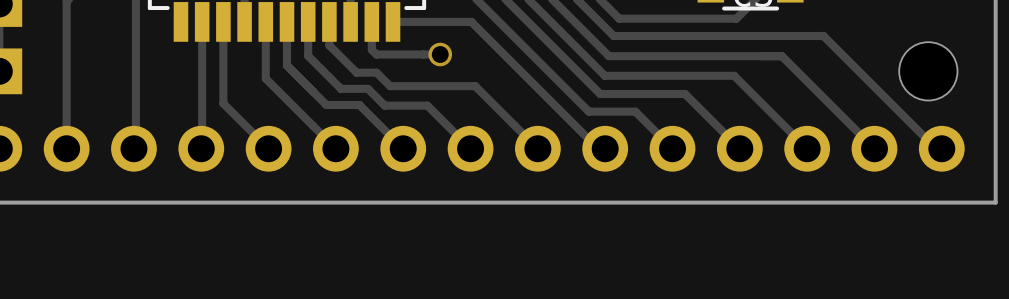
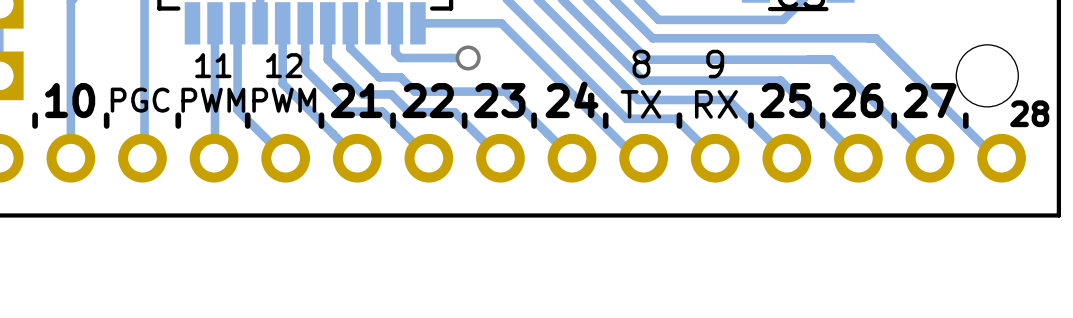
text: none -> 8 (641, 64)
text: none -> 9 (715, 64)
text: none -> 11 (213, 65)
text: none -> 12 (284, 65)
text: none -> 10 (70, 100)
text: none -> PGC (140, 100)
text: none -> PWM (213, 100)
text: none -> PWM (284, 100)
text: none -> 21 (356, 100)
text: none -> 22 (428, 100)
text: none -> 23 (499, 100)
text: none -> 24 (572, 99)
text: none -> 25 (786, 100)
text: none -> 26 (857, 100)
text: none -> 27 (930, 100)
text: none -> TX (640, 104)
text: none -> RX (716, 104)
text: none -> 28 (1029, 113)
line: none -> (35, 115) (35, 125)
line: none -> (106, 115) (106, 125)
line: none -> (178, 115) (178, 125)
line: none -> (247, 115) (247, 125)
line: none -> (321, 115) (321, 125)
line: none -> (393, 115) (393, 125)
line: none -> (464, 115) (464, 125)
line: none -> (534, 115) (534, 125)
line: none -> (605, 115) (605, 125)
line: none -> (679, 115) (679, 125)
line: none -> (751, 115) (751, 125)
line: none -> (822, 115) (822, 125)
line: none -> (894, 115) (894, 125)
line: none -> (965, 115) (965, 125)

